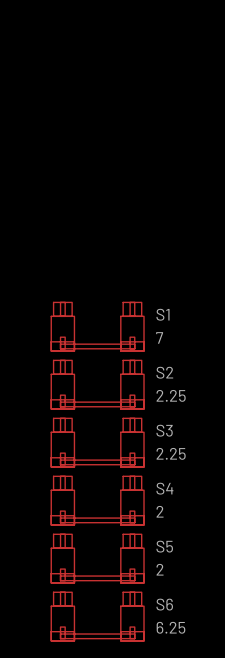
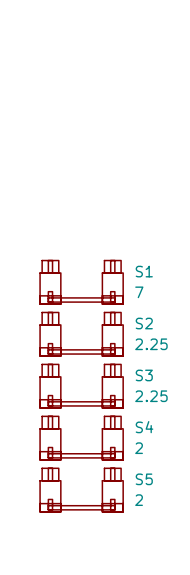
S6: 6.25 (97, 616) -> none

